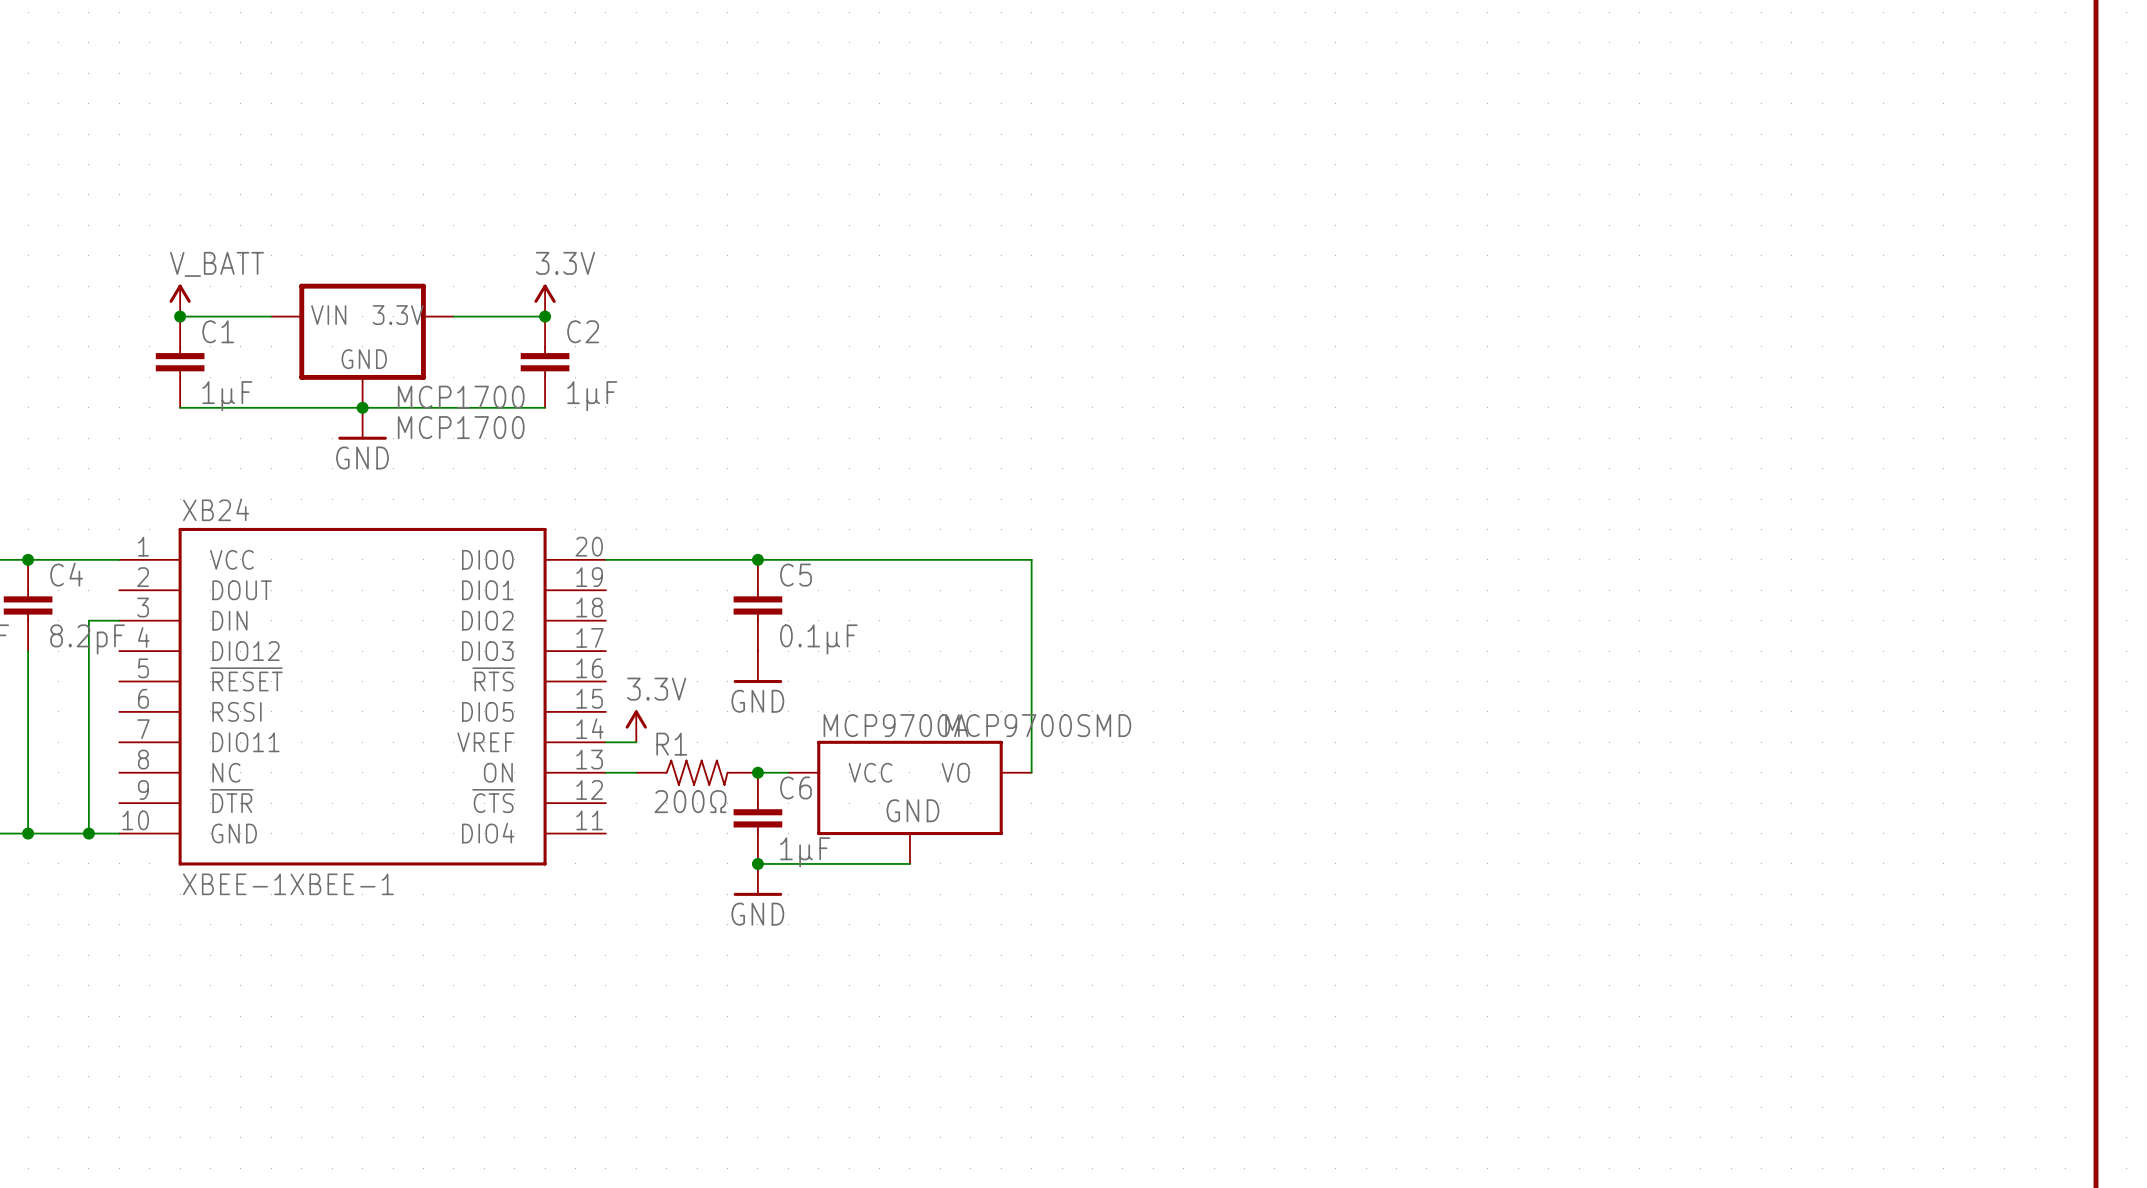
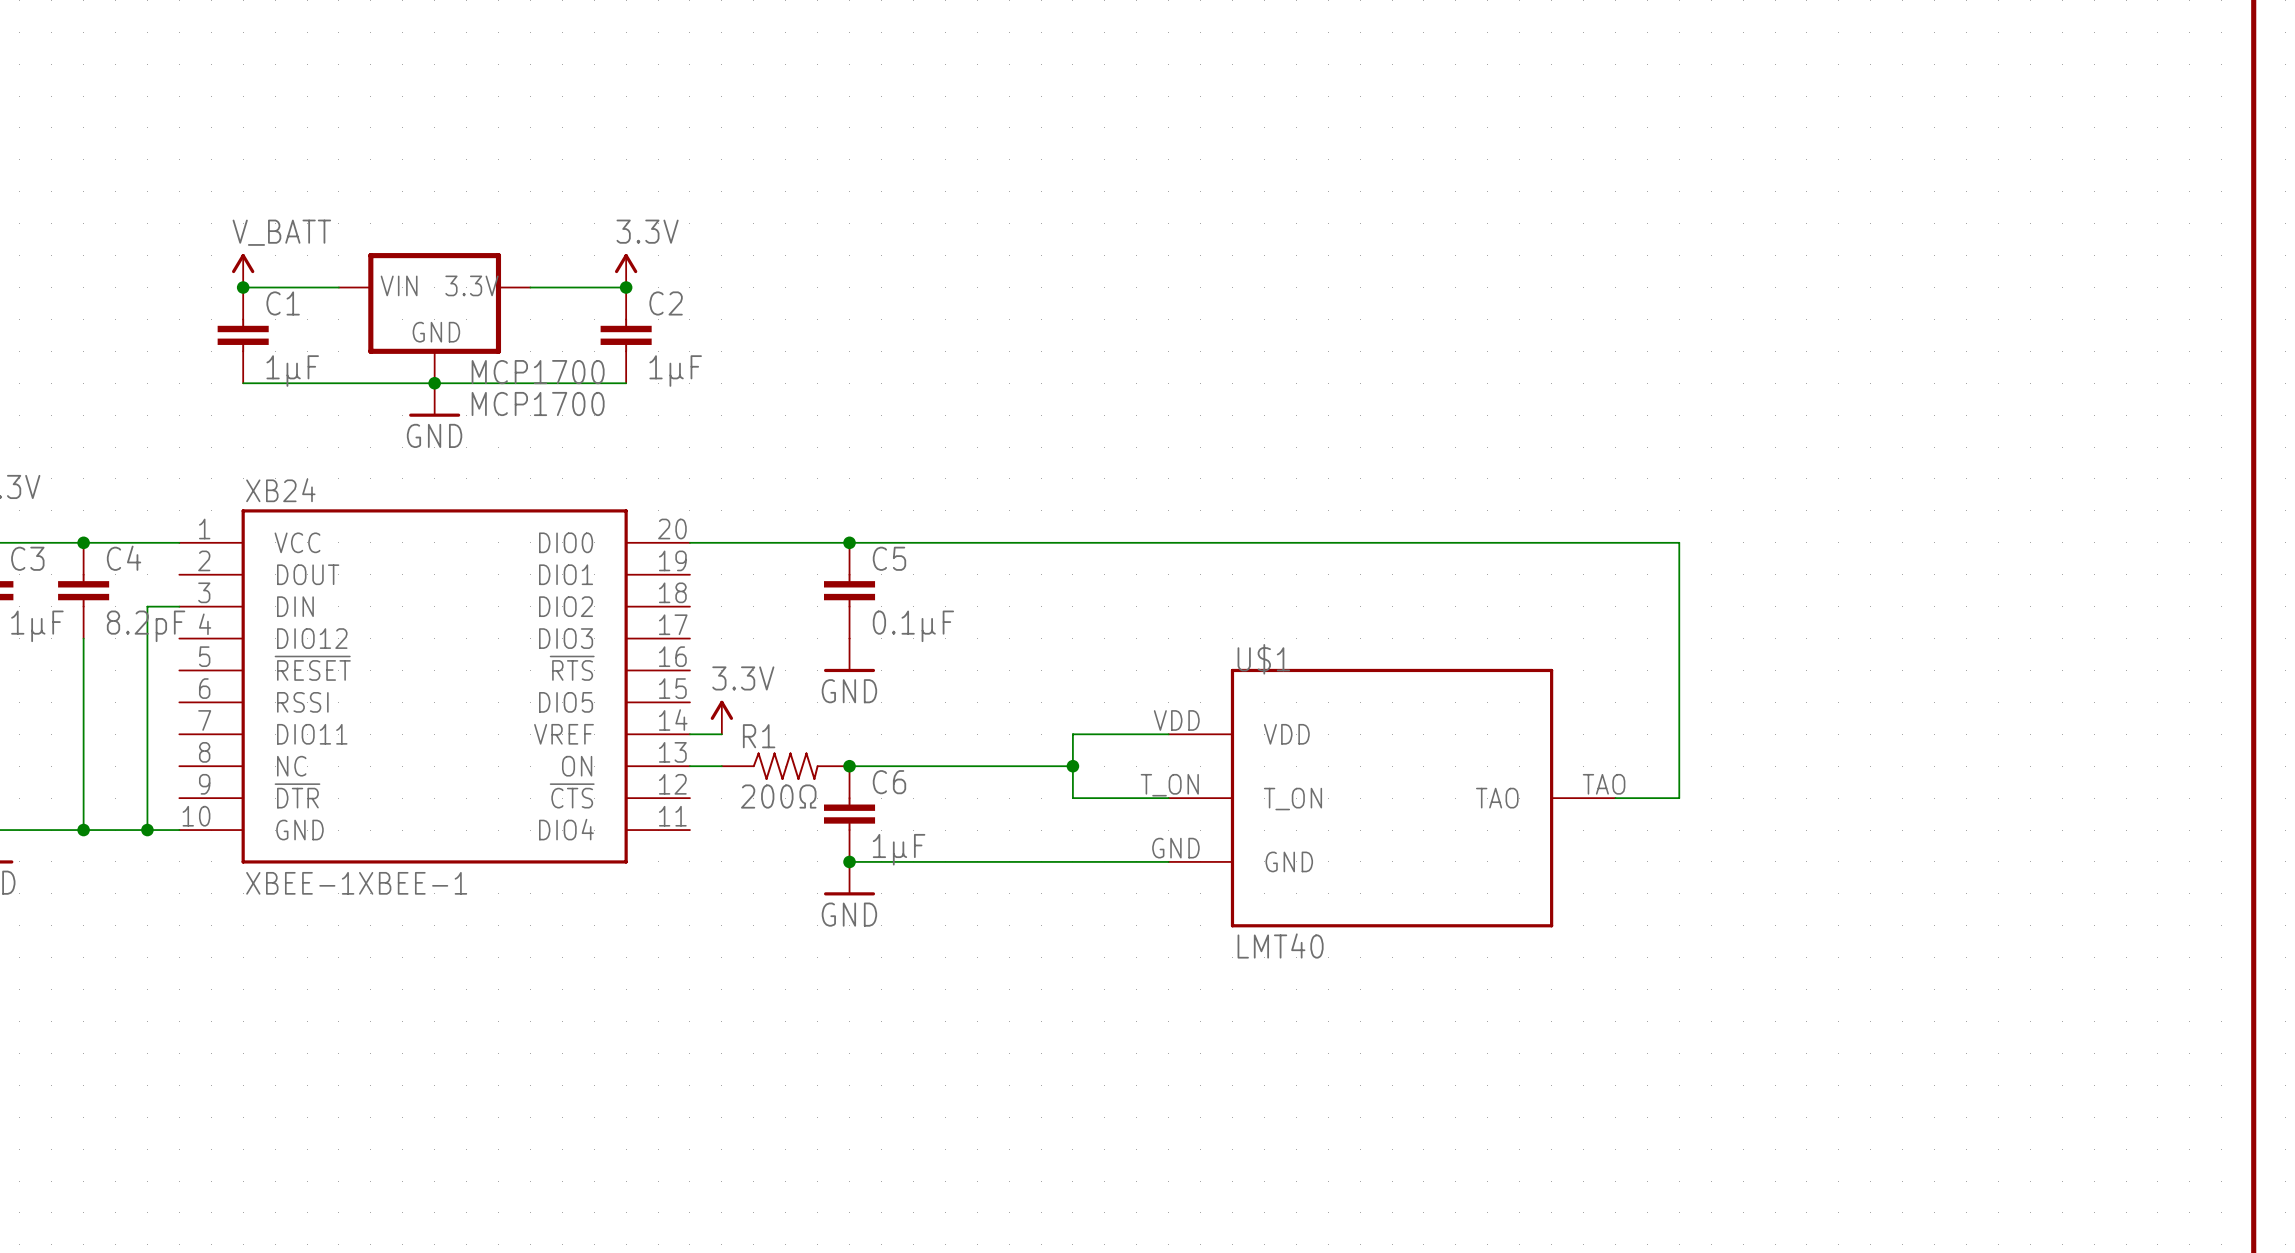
wire: (1031, 559) (1031, 772) -> (1136, 542) (1679, 542) (1679, 798) (1615, 798)
wire: none -> (1168, 734) (1072, 734) (1072, 798) (1168, 798)
wire: none -> (881, 766) (1072, 766)
junction: none -> (1072, 766)
MCP9700A: MCP9700SMD (909, 802) -> none
U$1: none -> LMT40 (1392, 798)
wire: none -> (1009, 861) (1168, 861)

